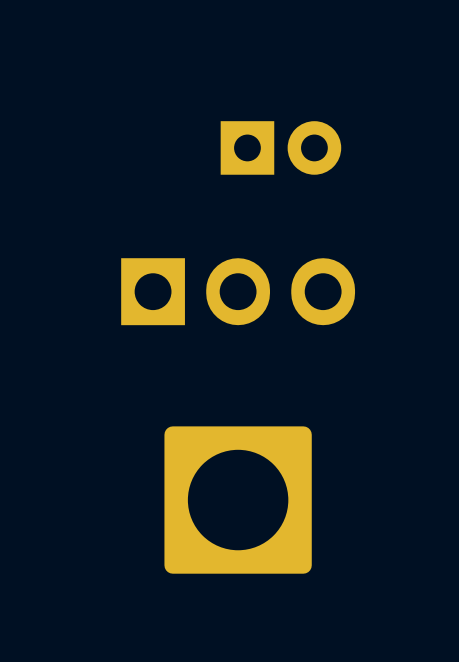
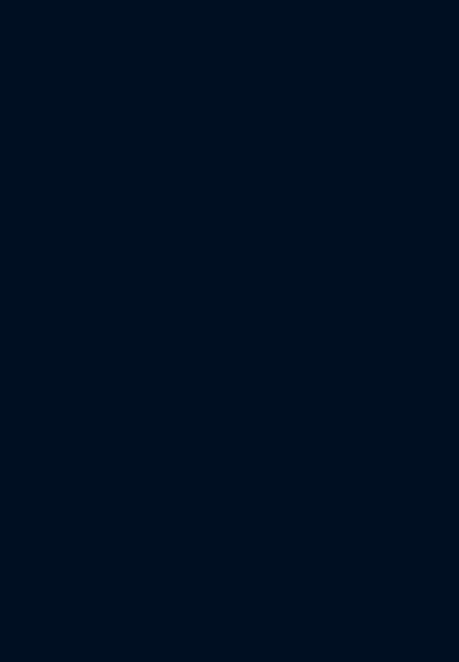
part: (280, 147) -> none
part: (238, 291) -> none
part: (238, 500) -> none

